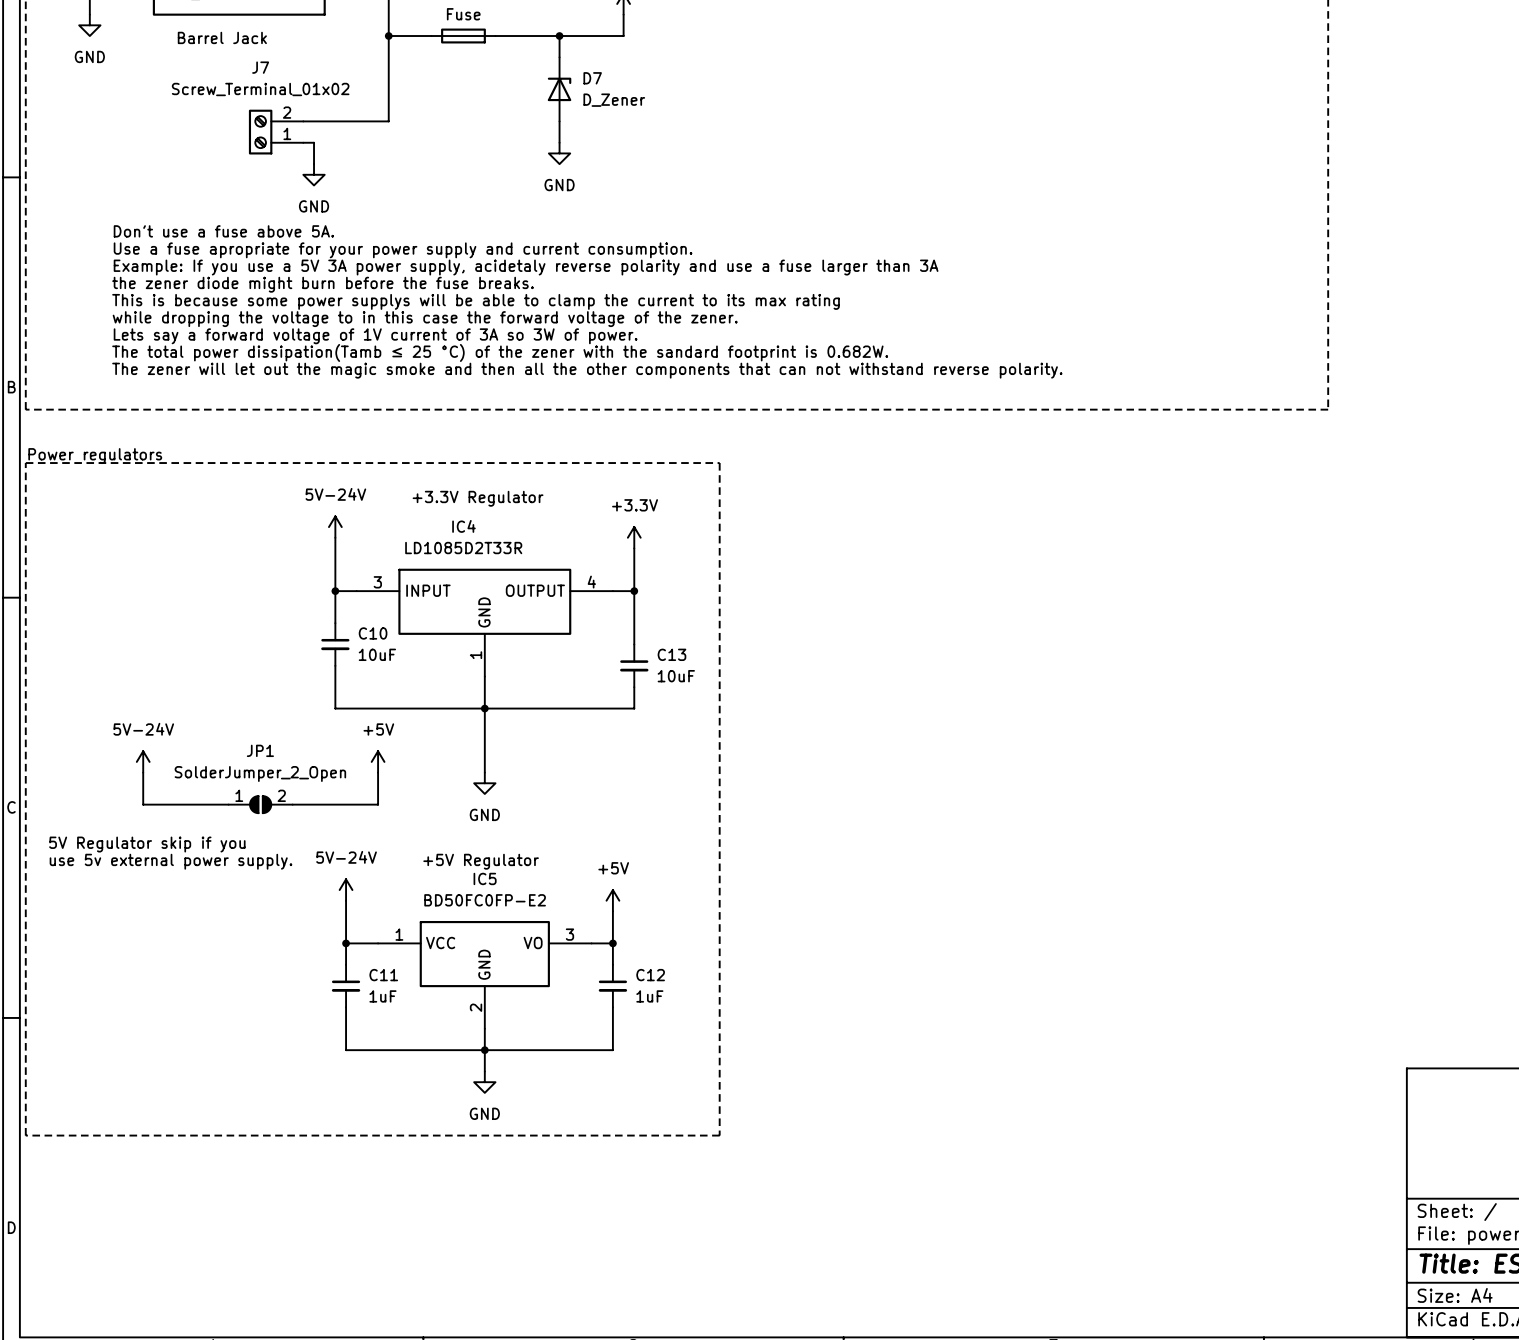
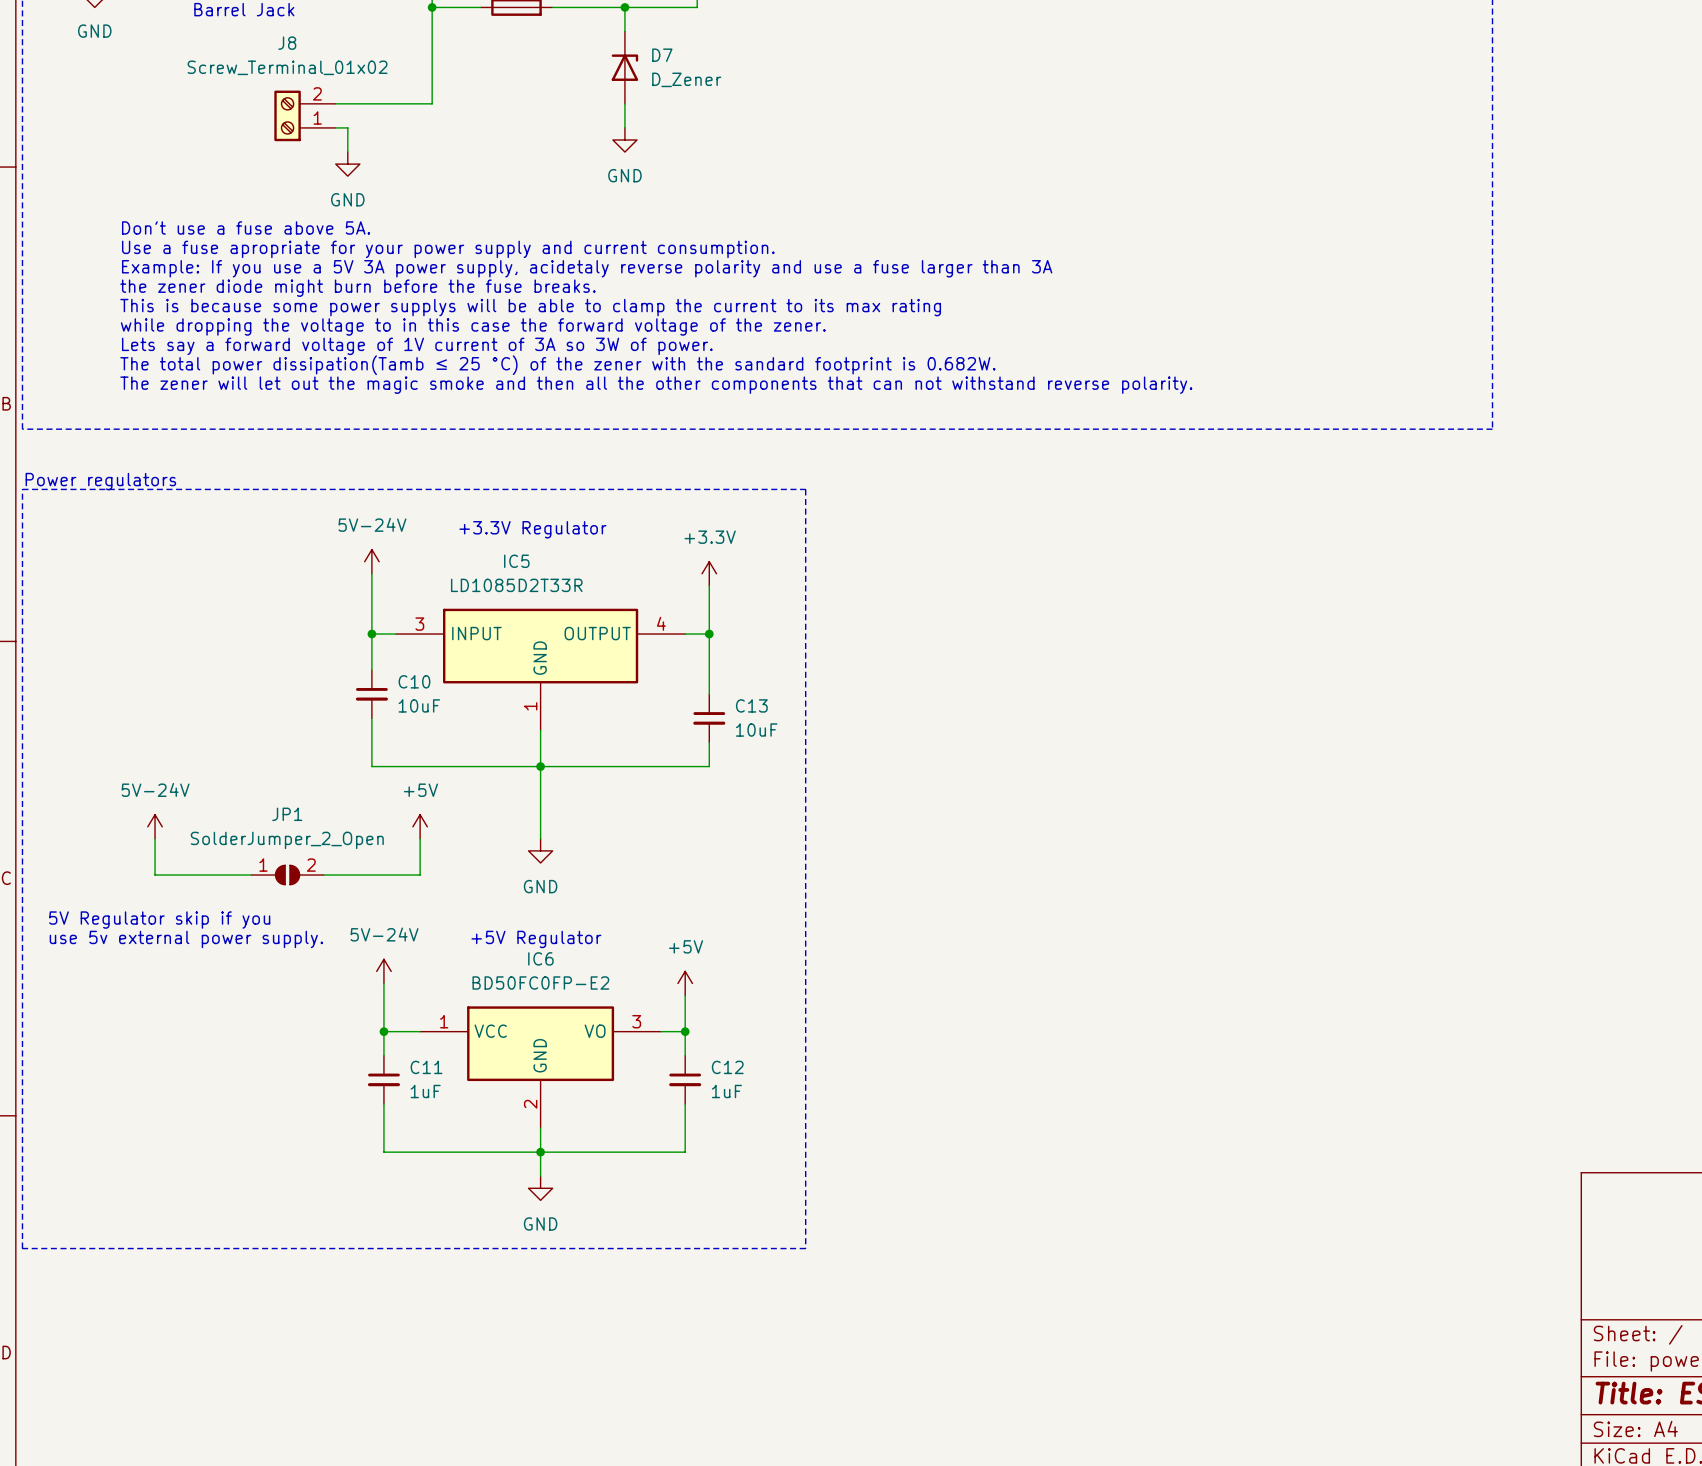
J7 name: J7 (260, 67) -> J8 (287, 43)
IC4 name: IC4 (463, 526) -> IC5 (516, 561)
IC5 name: IC5 (485, 878) -> IC6 (540, 958)

